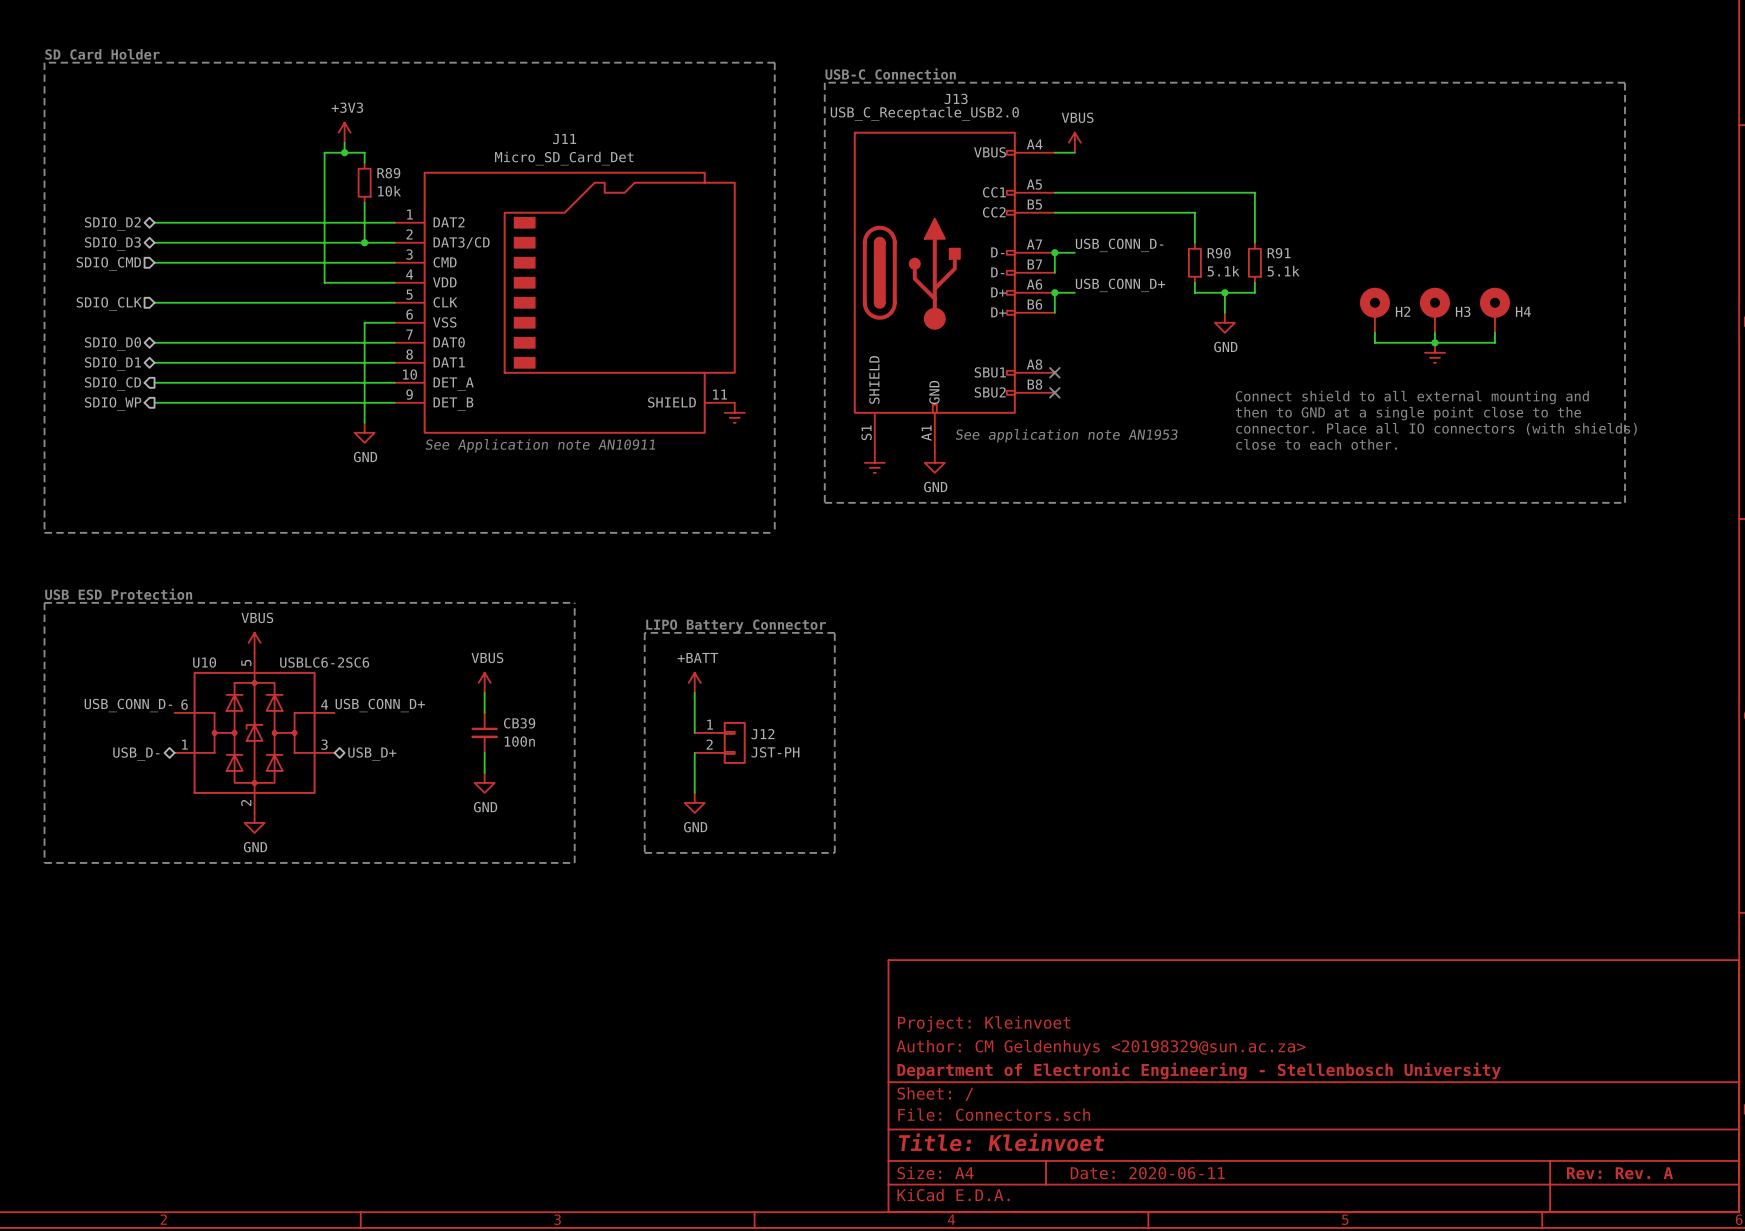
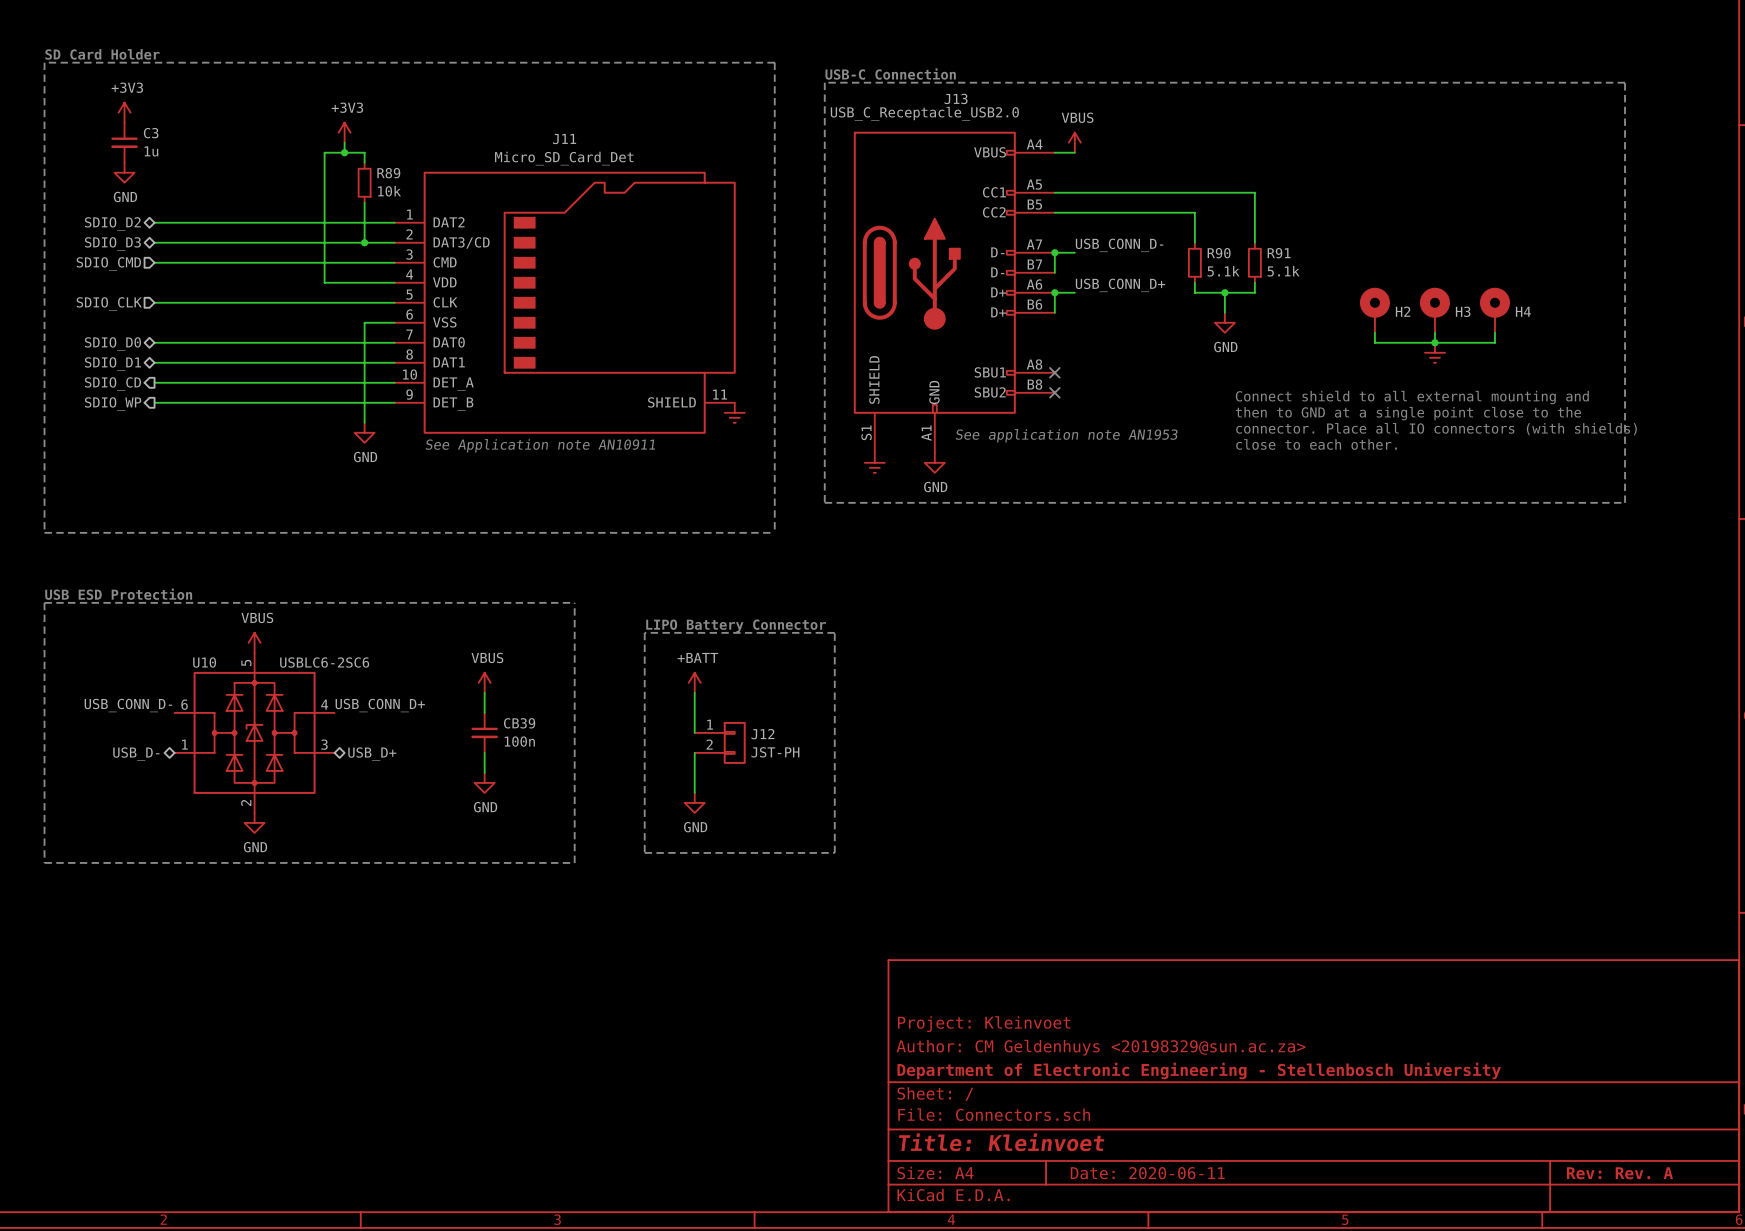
power symbol: none -> +3V3 (124, 112)
C3: none -> 1u (124, 142)
power symbol: none -> GND (124, 172)

